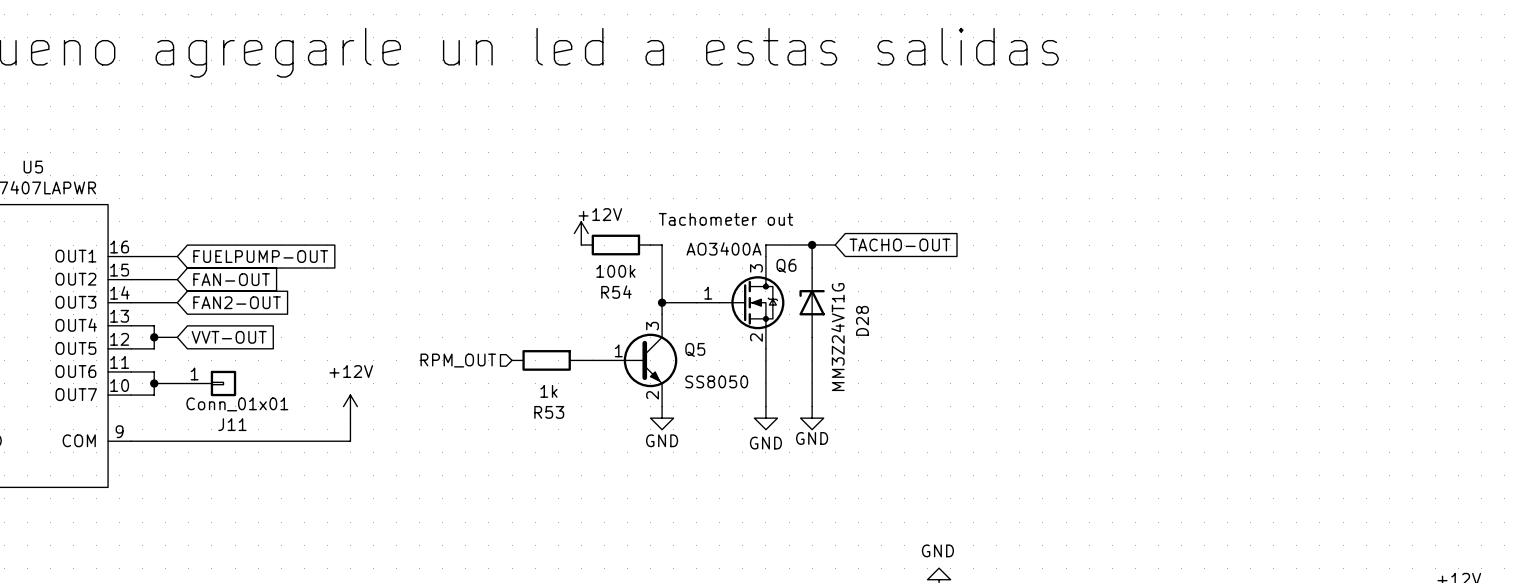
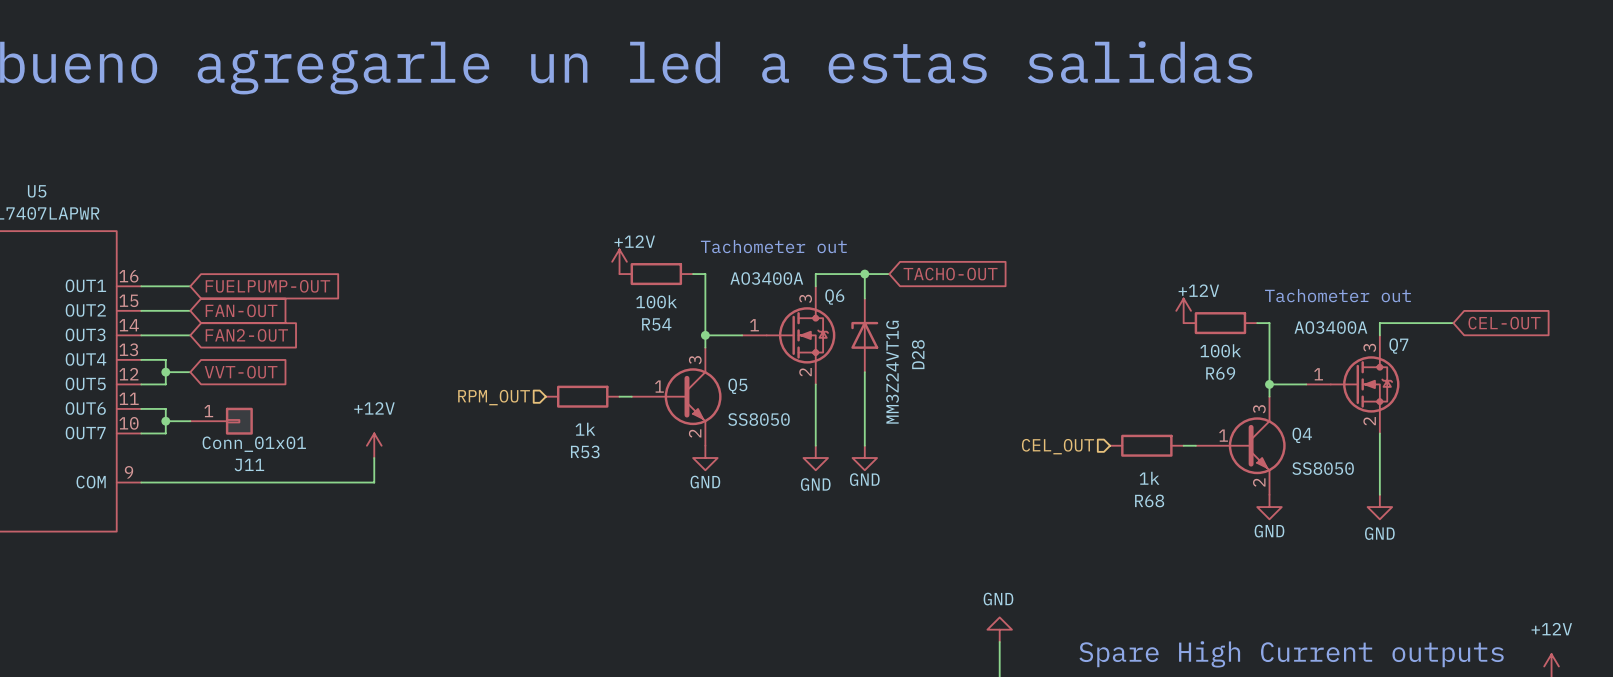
text: none -> Tachometer out (1337, 295)
power symbol: none -> +12V (1183, 310)
R69: none -> 100k (1220, 323)
wire: none -> (1257, 323) (1269, 323) (1269, 396)
wire: none -> (1453, 323) (1379, 323) (1379, 335)
global label: none -> CEL-OUT (1504, 323)
wire: none -> (1269, 384) (1306, 384)
junction: none -> (1269, 384)
Q7: none -> AO3400A (1352, 384)
wire: none -> (1379, 433) (1379, 494)
hierarchical label: none -> CEL_OUT (1057, 446)
R68: none -> 1k (1146, 445)
wire: none -> (1183, 445) (1195, 445)
Q4: none -> SS8050 (1240, 445)
power symbol: none -> GND (1269, 507)
power symbol: none -> GND (1379, 507)

